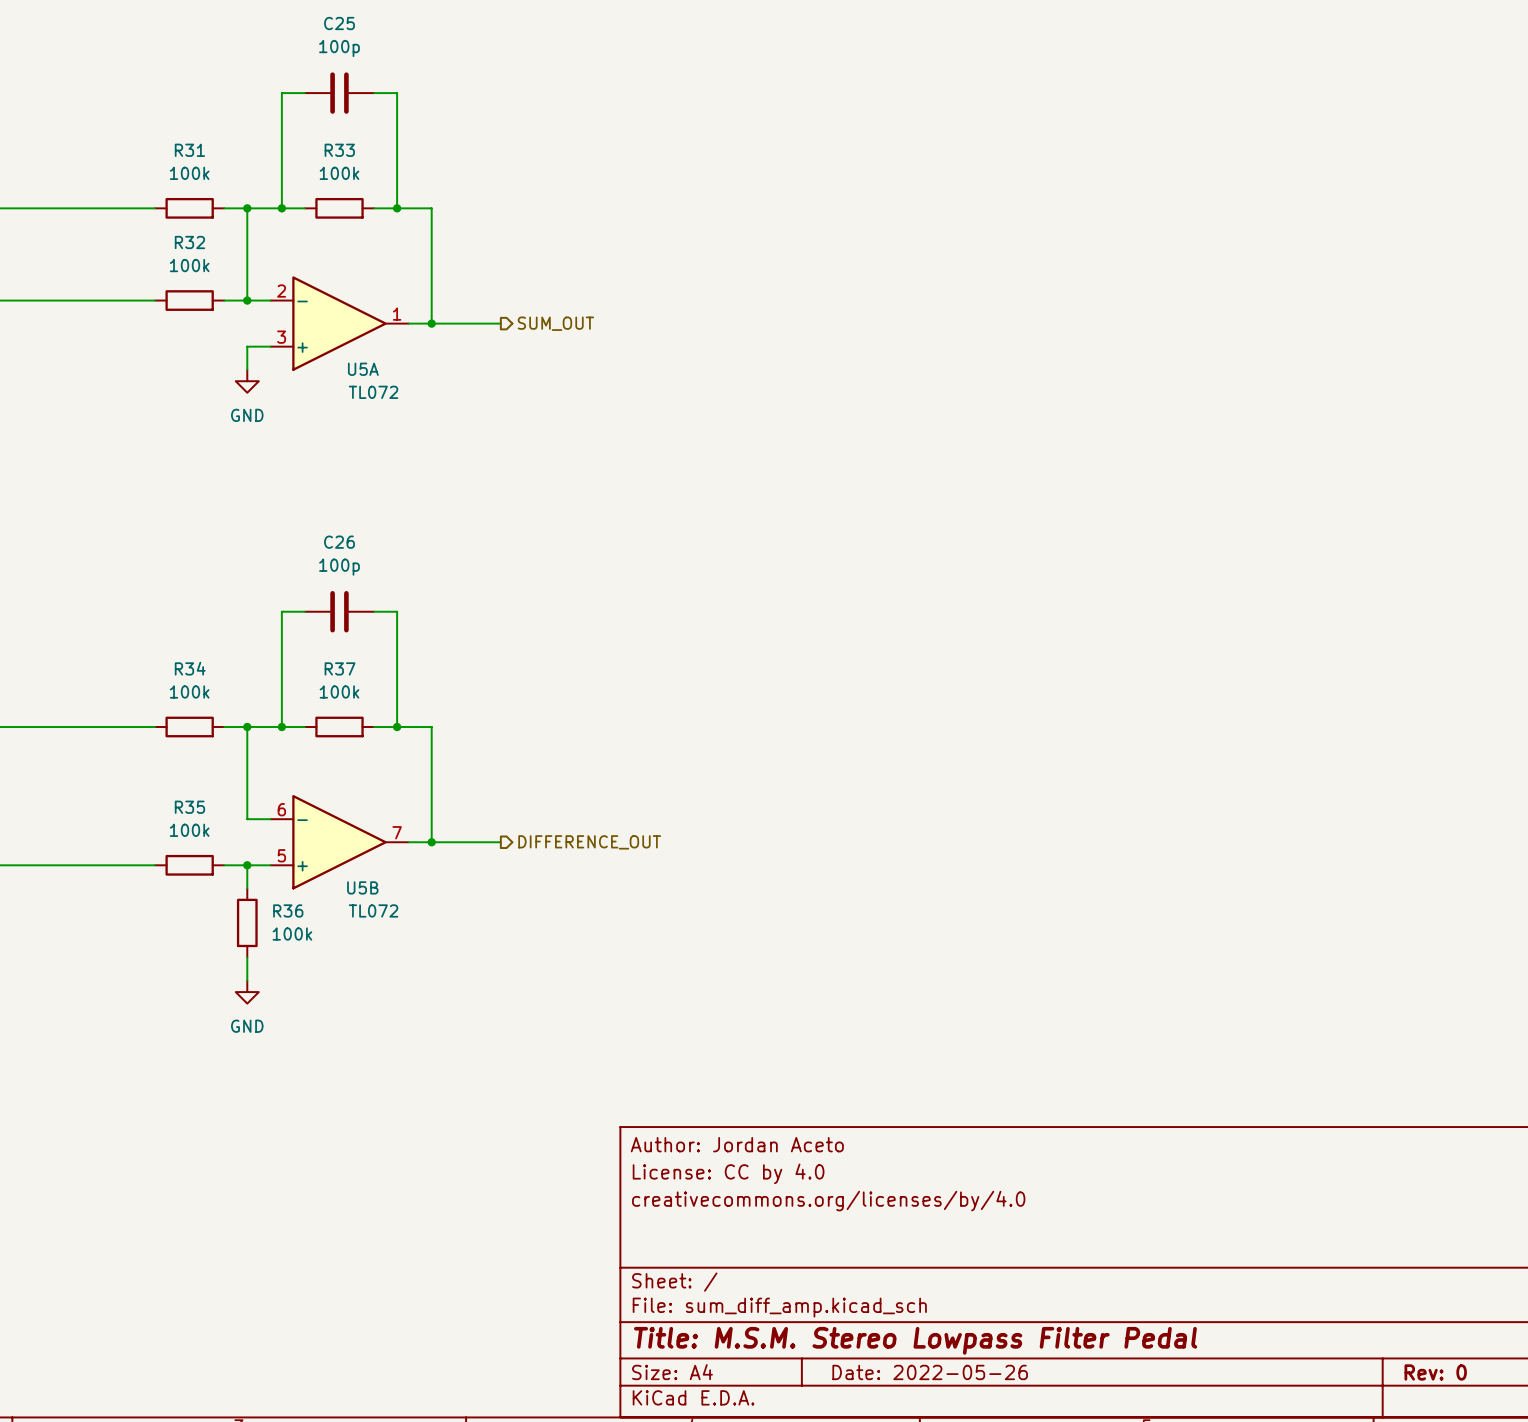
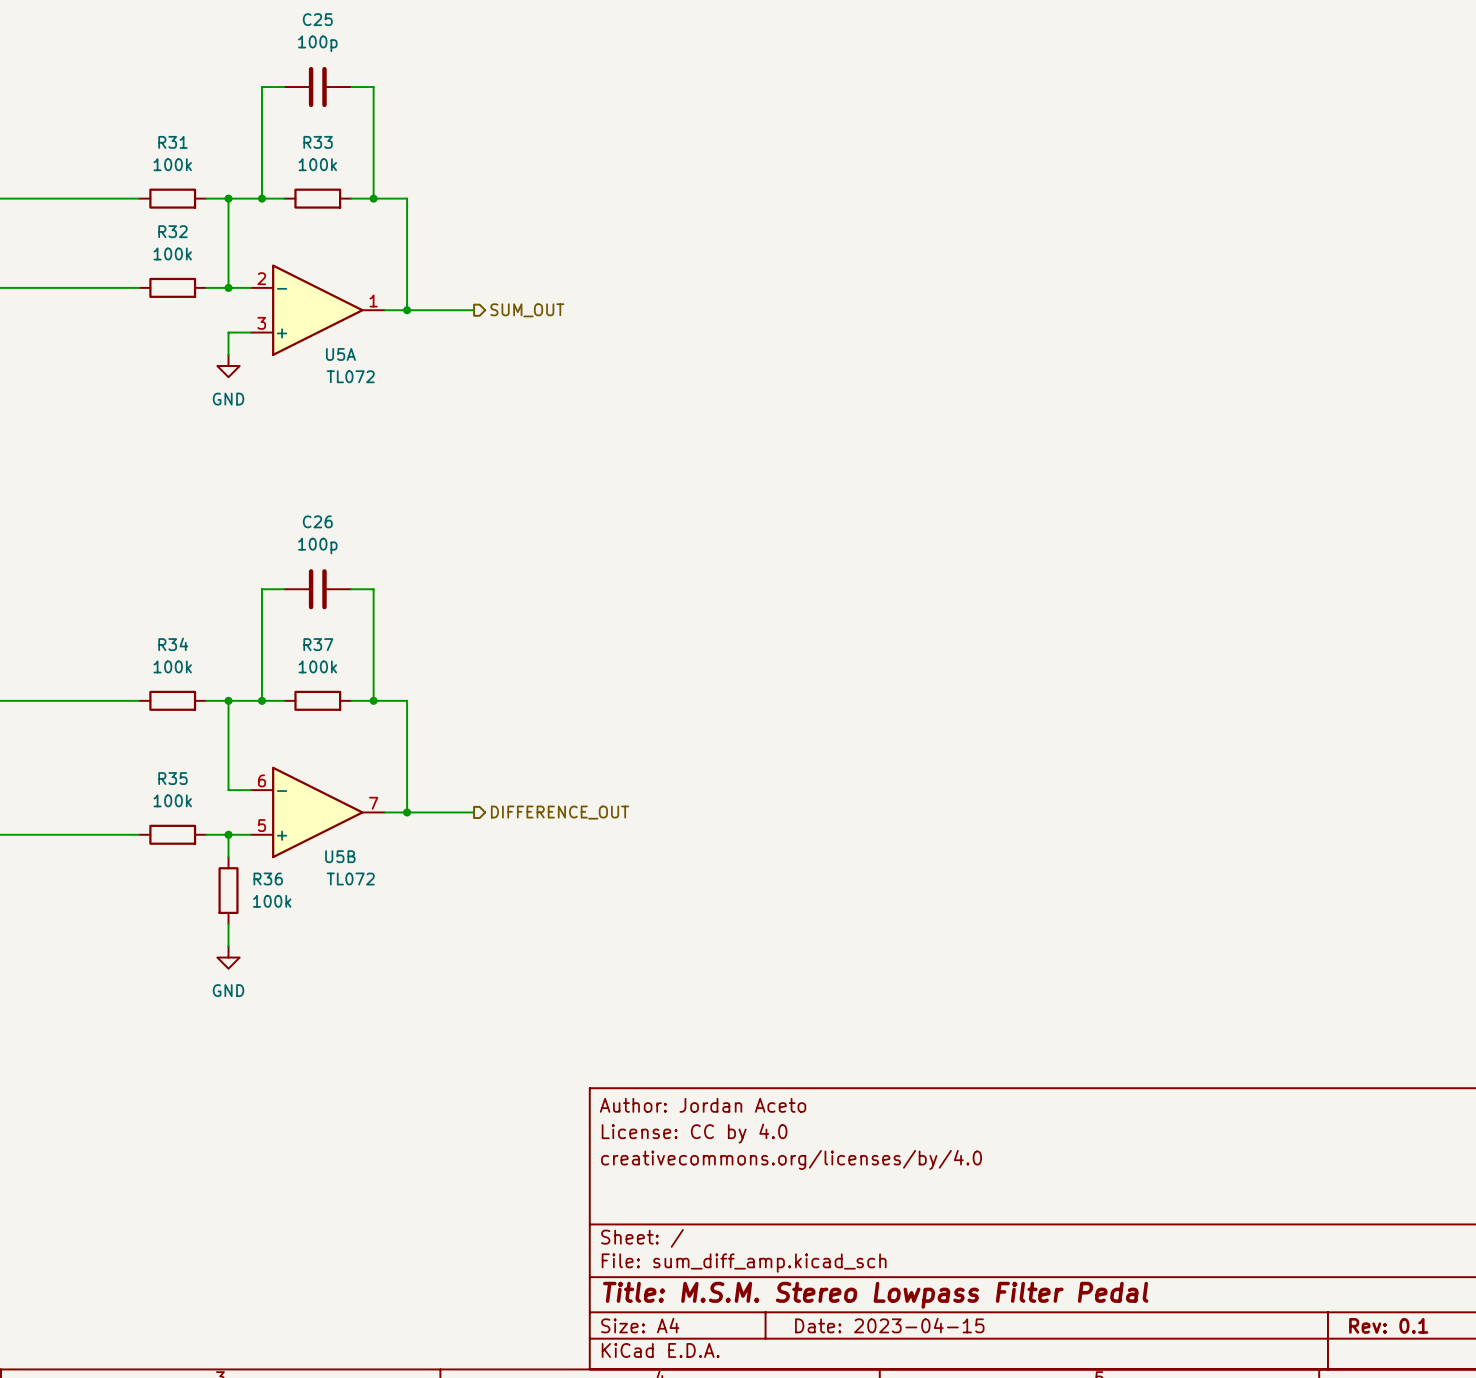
title block: Date: 2022-05-26 (930, 1372) -> Date: 2023-04-15 (889, 1325)
title block: Rev: 0 (1435, 1372) -> Rev: 0.1 (1388, 1325)

